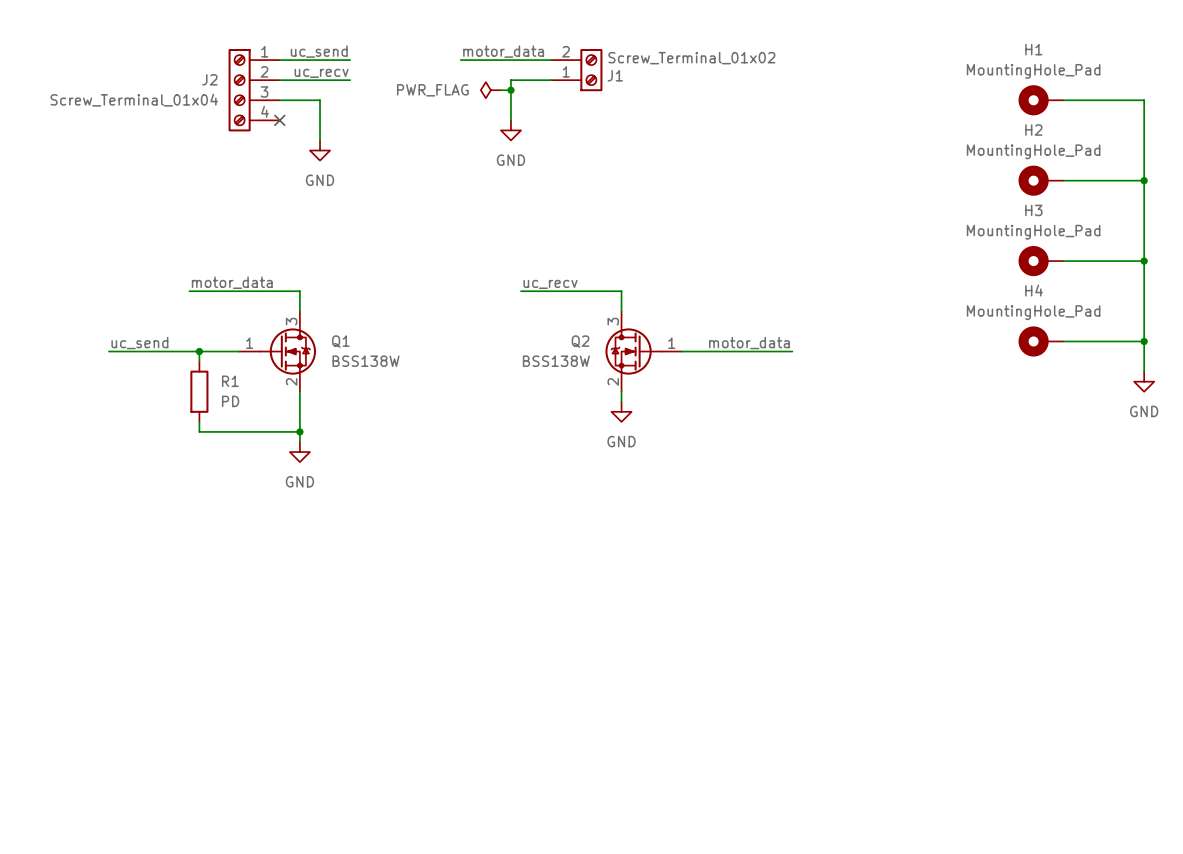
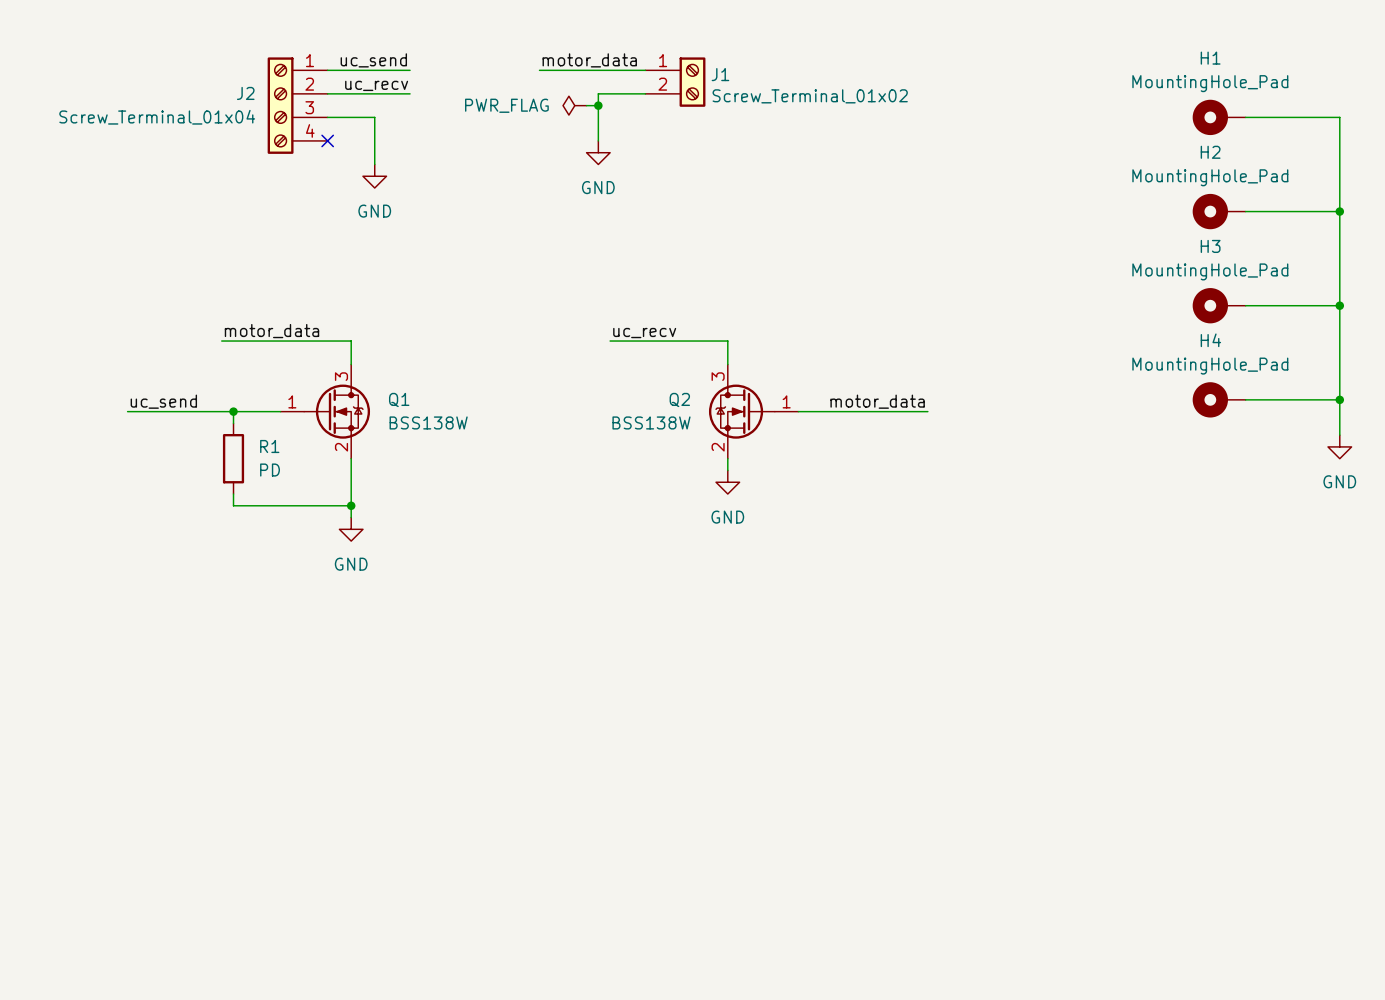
J1 flip: as is (591, 70) -> up-down (692, 82)

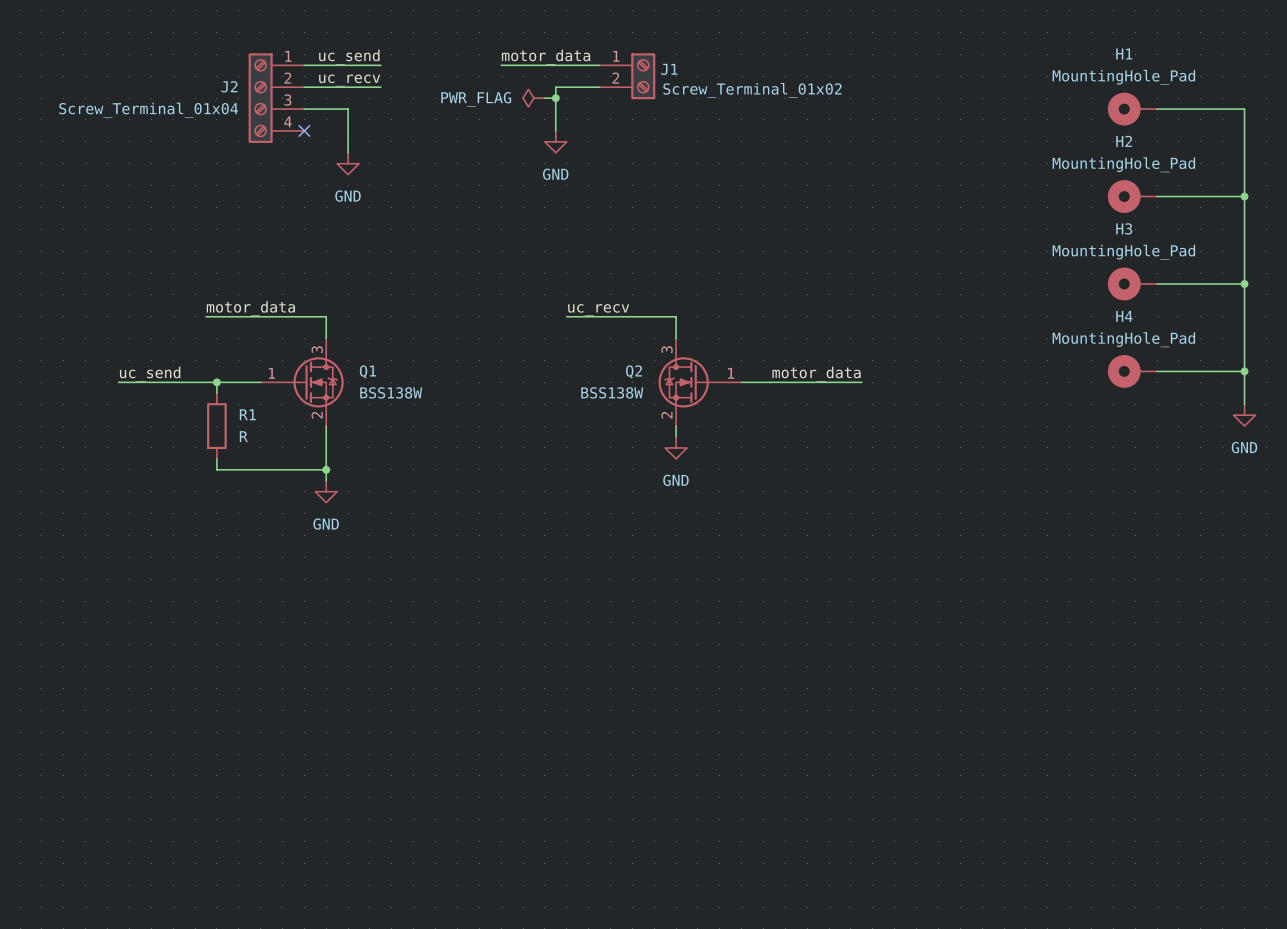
R1 value: PD (270, 470) -> R (243, 436)

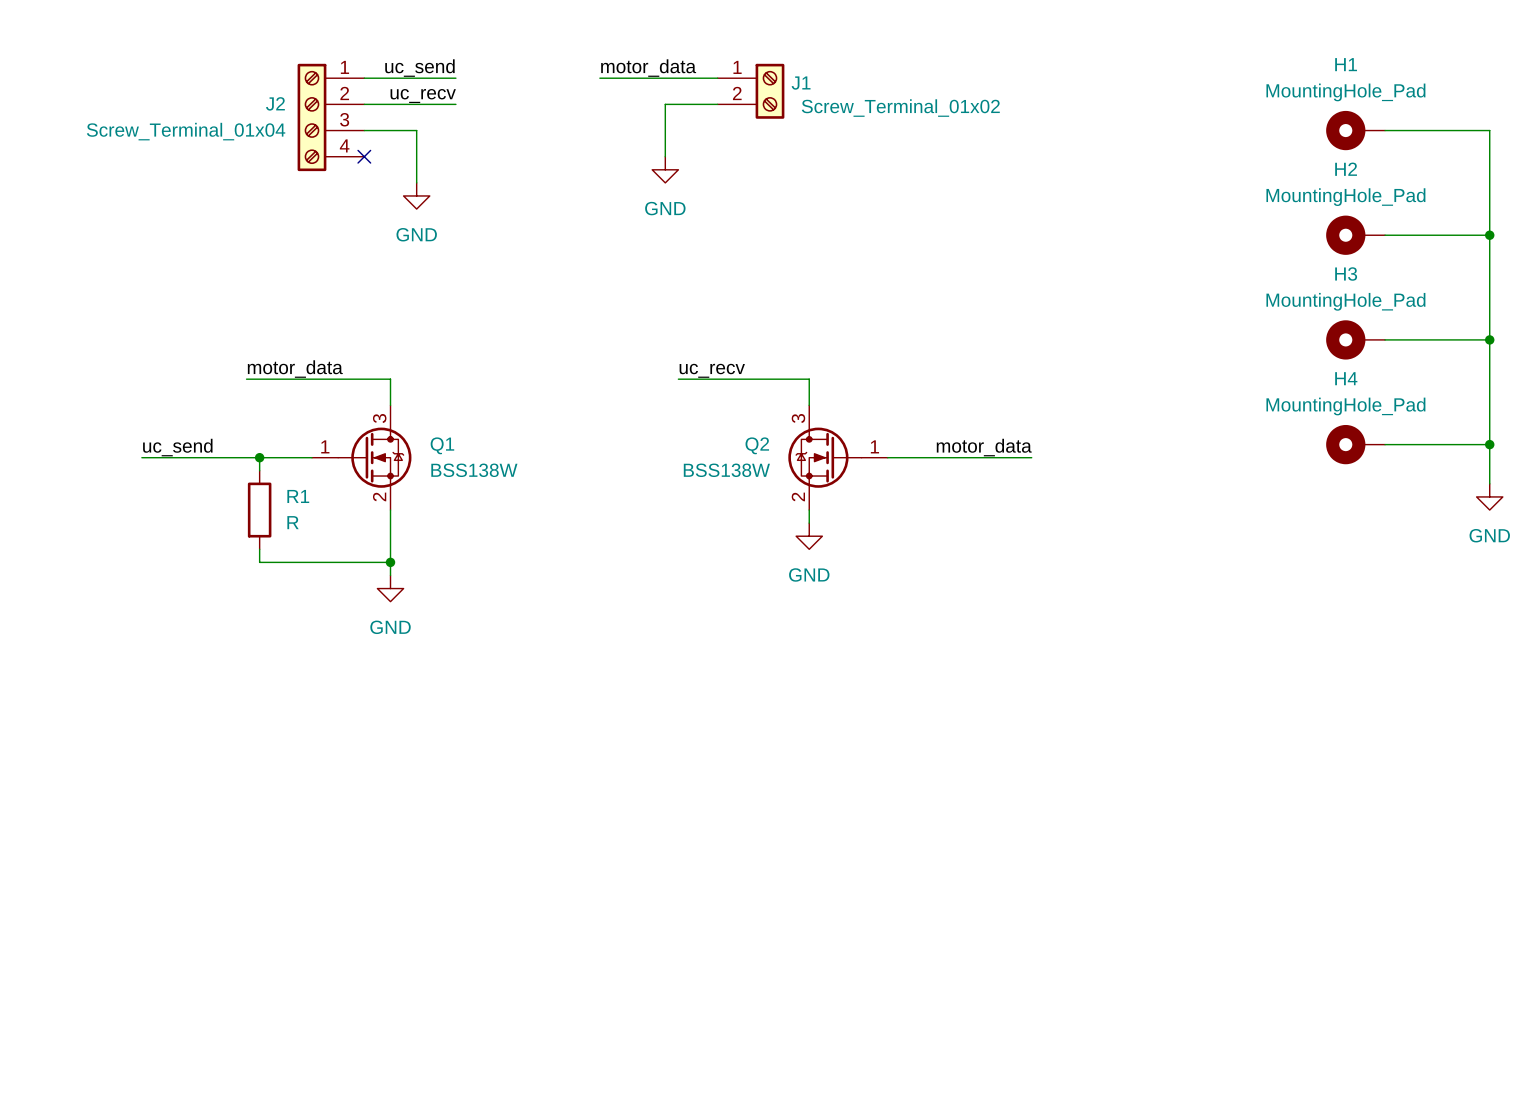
power symbol: PWR_FLAG (533, 98) -> none
wire: (544, 98) (555, 98) -> none
junction: (555, 98) -> none

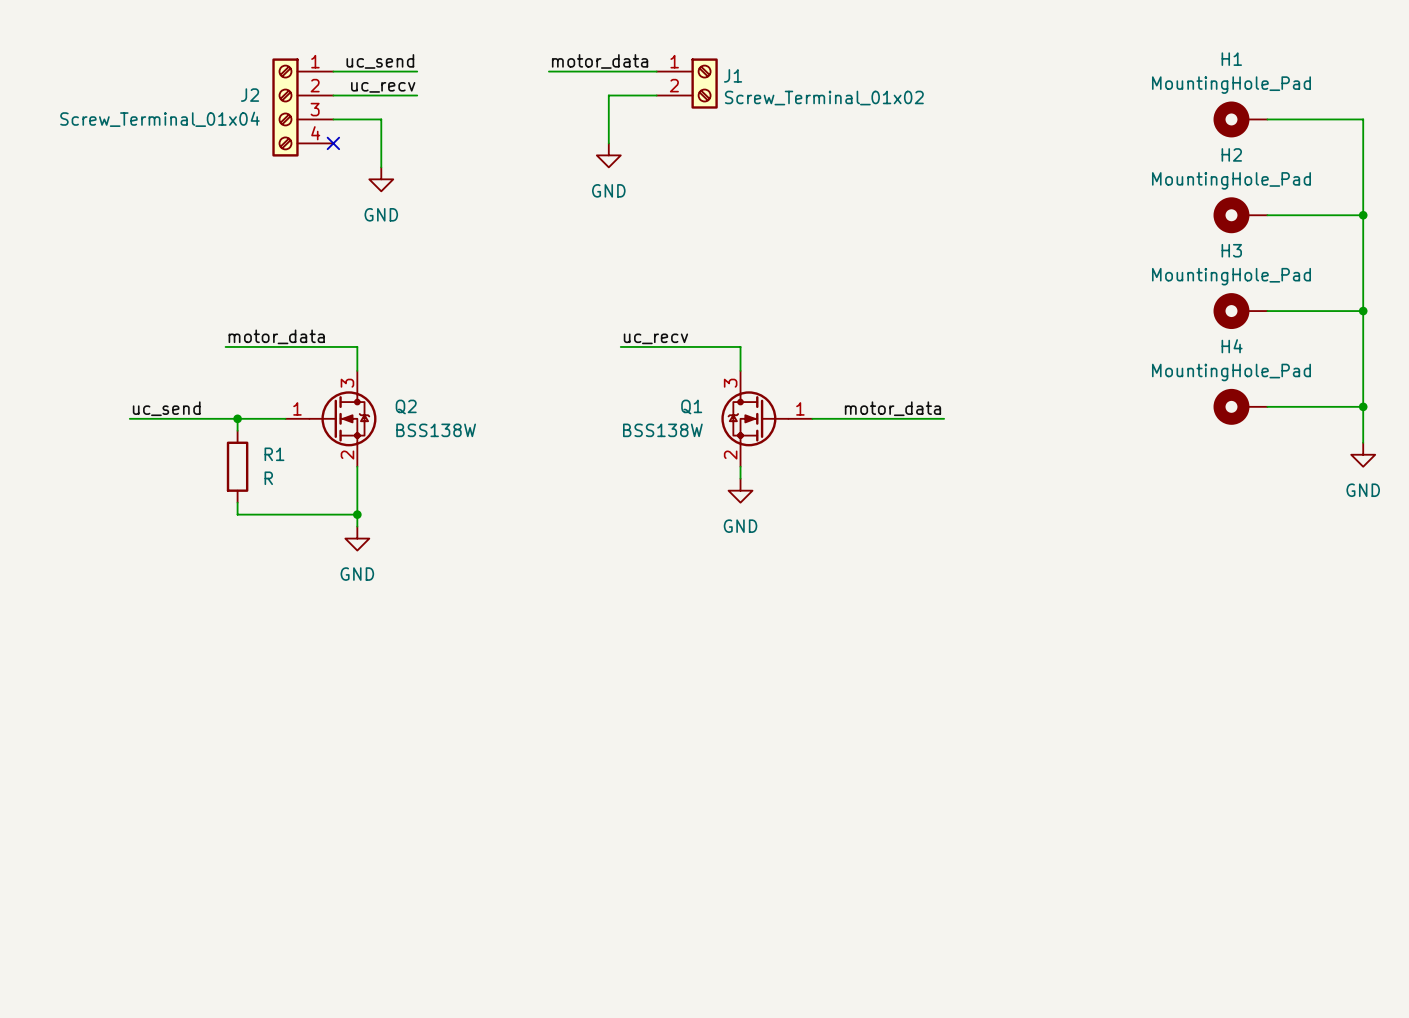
Q1 name: Q1 (442, 445) -> Q2 (406, 406)
Q2 name: Q2 (757, 445) -> Q1 (691, 406)

